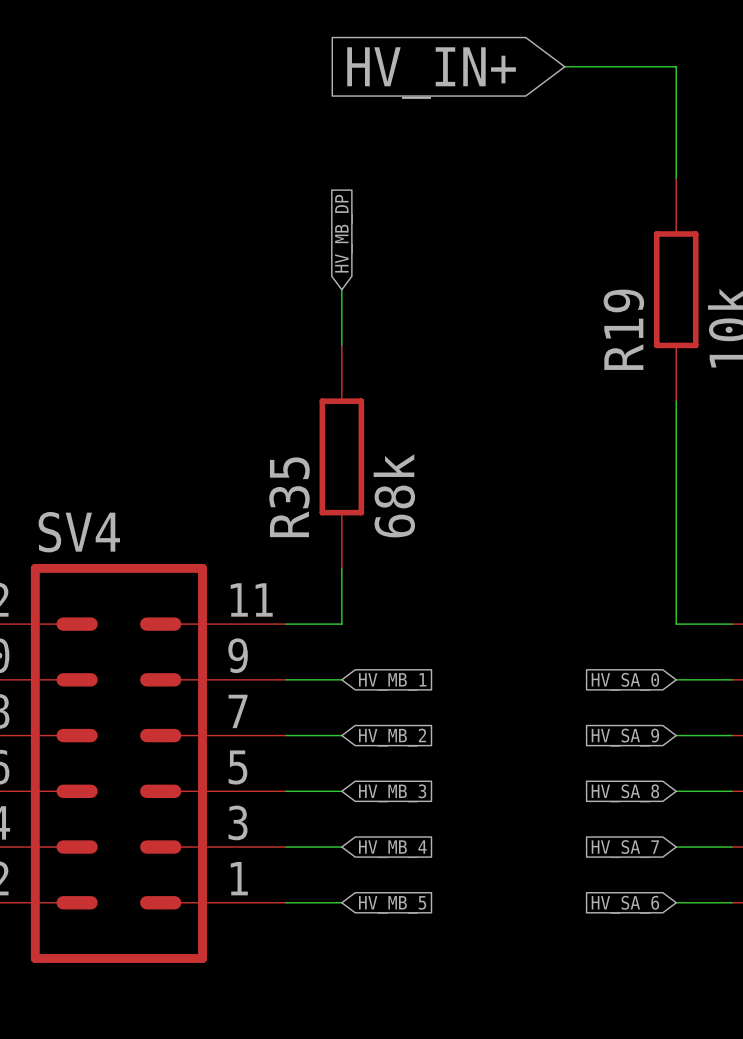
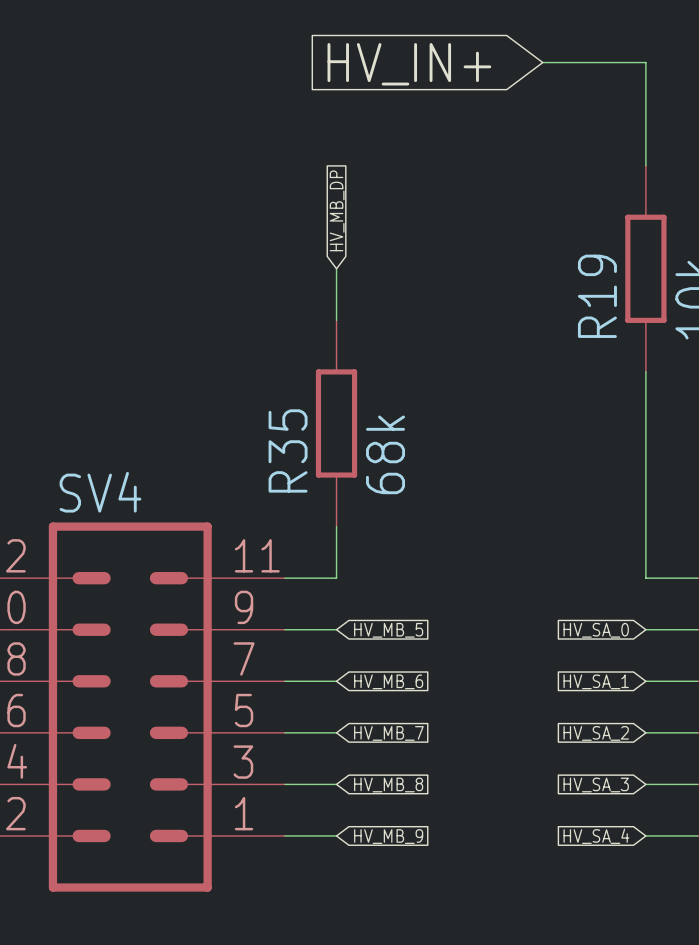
global label: HV_MB_1 (392, 682) -> HV_MB_5 (388, 630)
global label: HV_MB_2 (392, 737) -> HV_MB_6 (388, 681)
global label: HV_SA_9 (625, 737) -> HV_SA_1 (596, 681)
global label: HV_MB_3 (392, 793) -> HV_MB_7 (388, 733)
global label: HV_SA_8 (625, 793) -> HV_SA_2 (596, 733)
global label: HV_MB_4 (392, 849) -> HV_MB_8 (388, 784)
global label: HV_SA_7 (625, 849) -> HV_SA_3 (596, 784)
global label: HV_MB_5 (392, 904) -> HV_MB_9 (388, 836)
global label: HV_SA_6 (625, 904) -> HV_SA_4 (596, 836)

